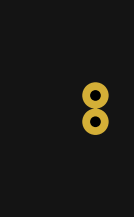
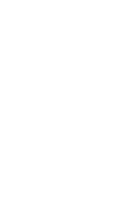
part: (95, 95) -> none
part: (95, 121) -> none

